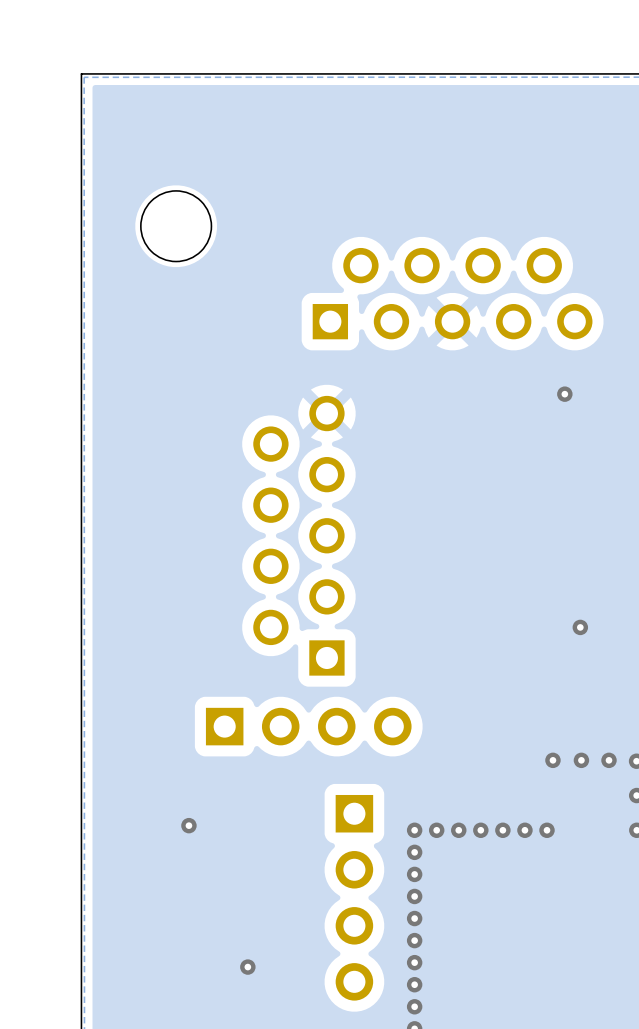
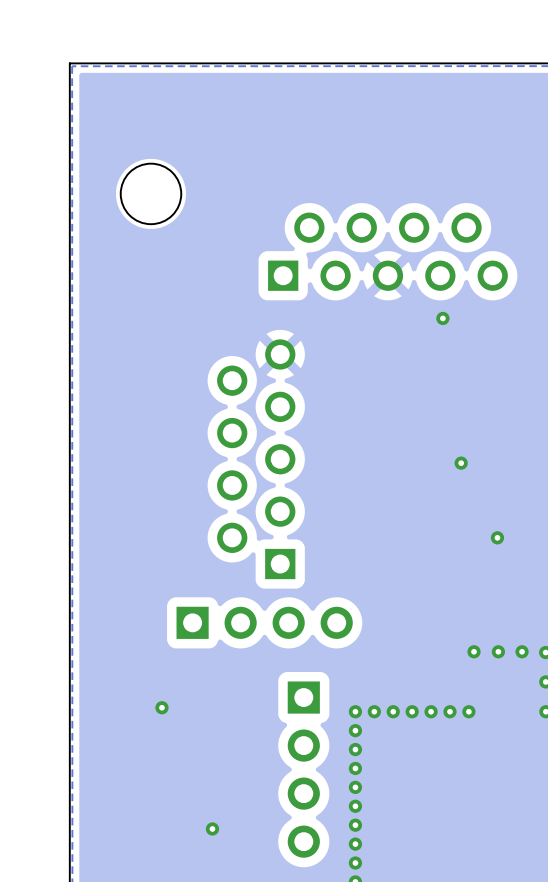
via position: (564, 394) -> (442, 318)
via: none -> (461, 463)

